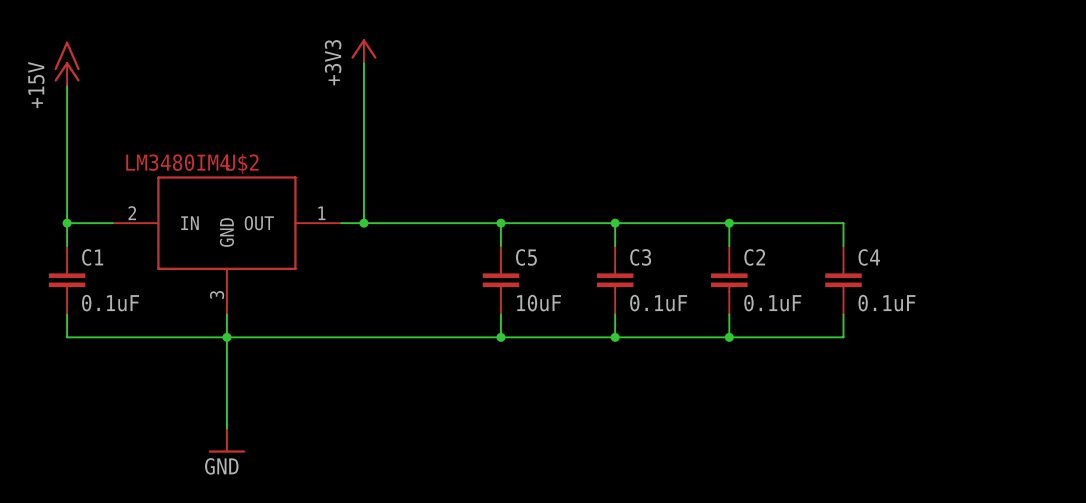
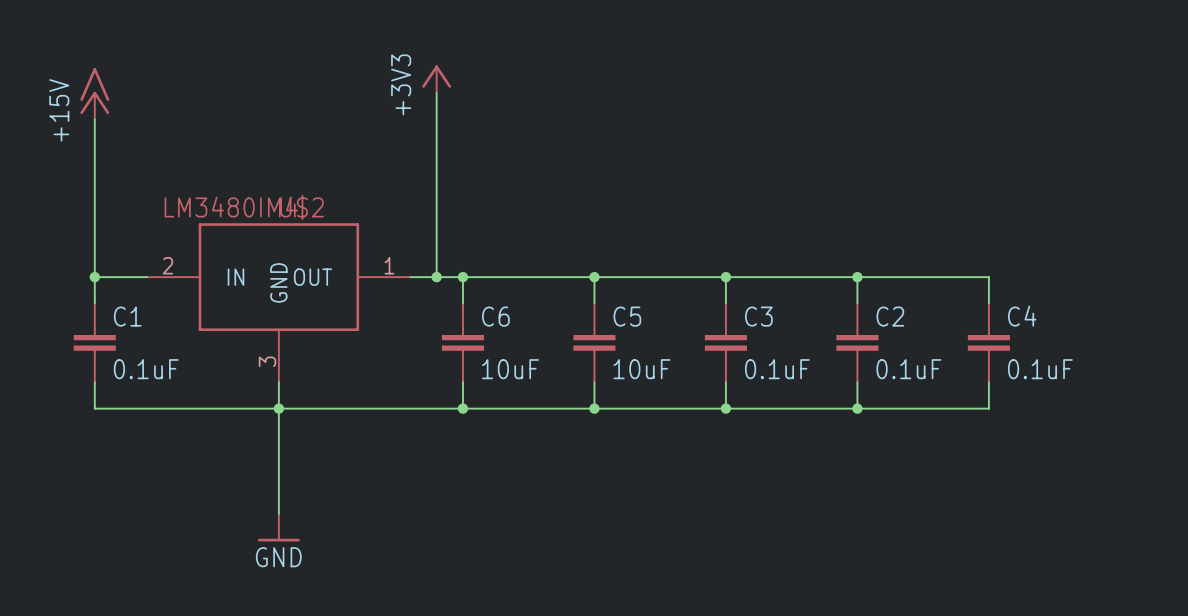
wire: none -> (462, 277) (462, 303)
junction: none -> (462, 277)
C6: none -> 10uF (462, 342)
wire: none -> (462, 382) (462, 408)
junction: none -> (462, 408)

